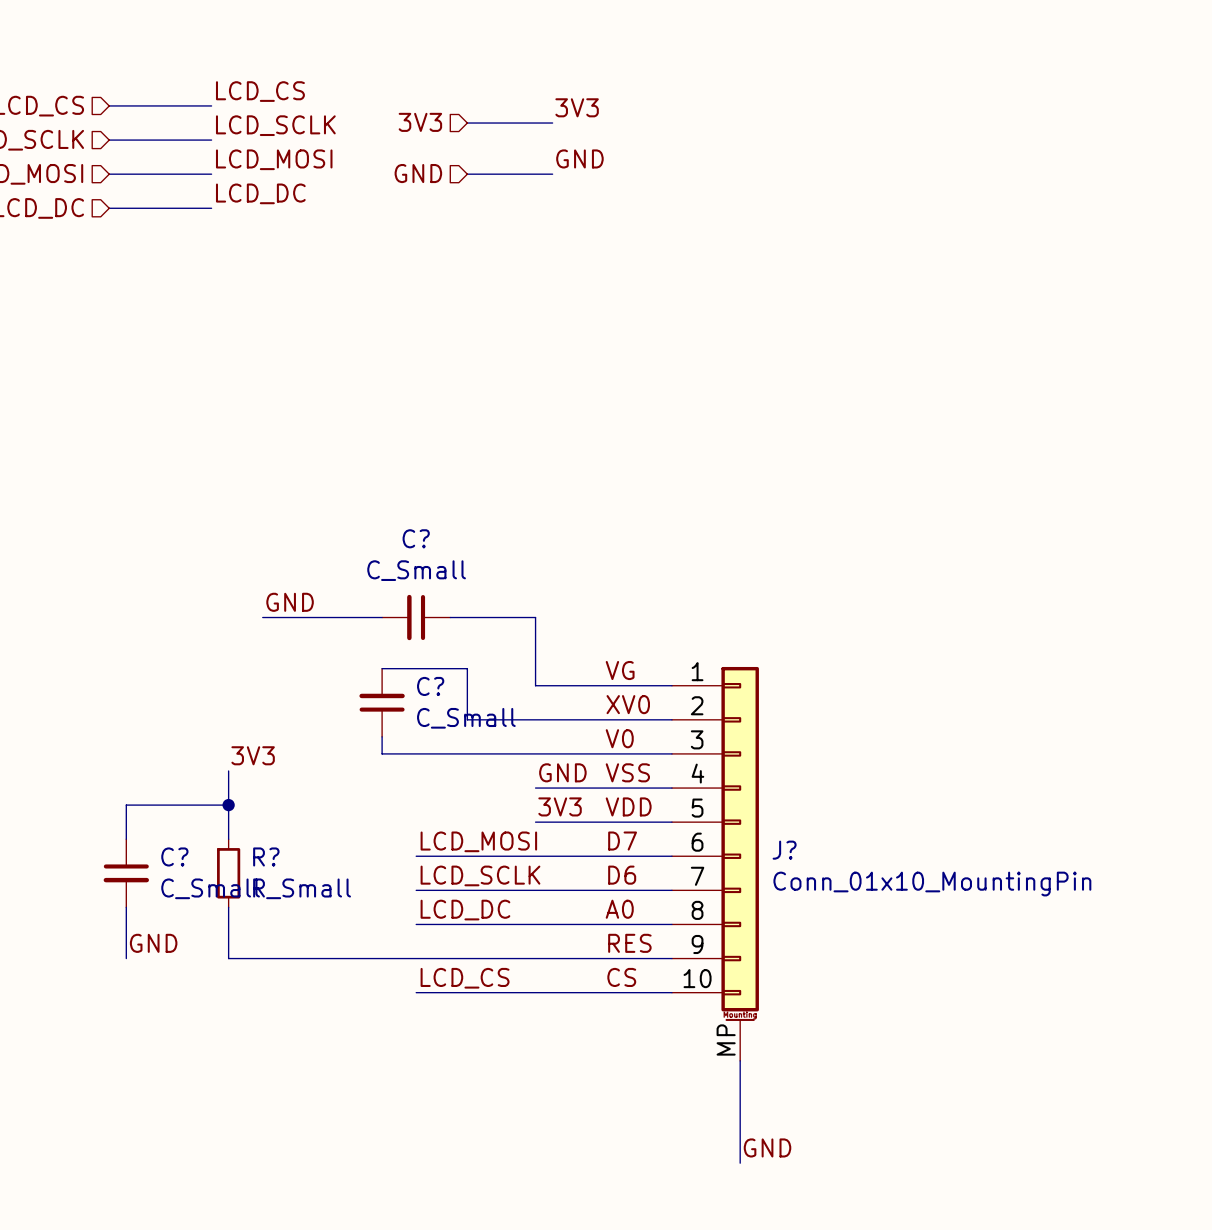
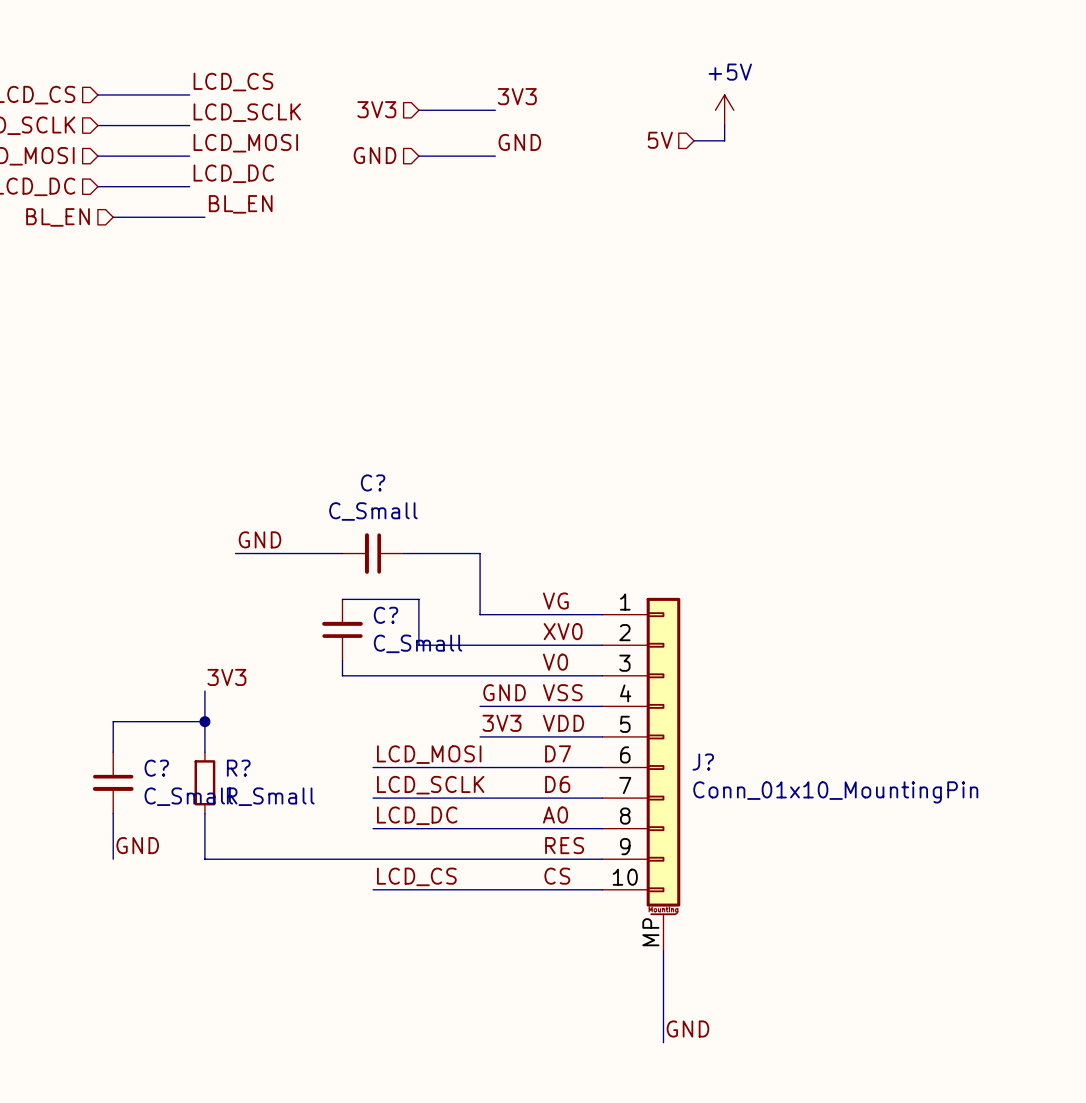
power symbol: none -> +5V (724, 110)
wire: none -> (724, 125) (724, 140) (694, 140)
hierarchical label: none -> 5V (660, 140)
label: none -> BL_EN (240, 204)
hierarchical label: none -> BL_EN (58, 217)
wire: none -> (113, 217) (204, 217)

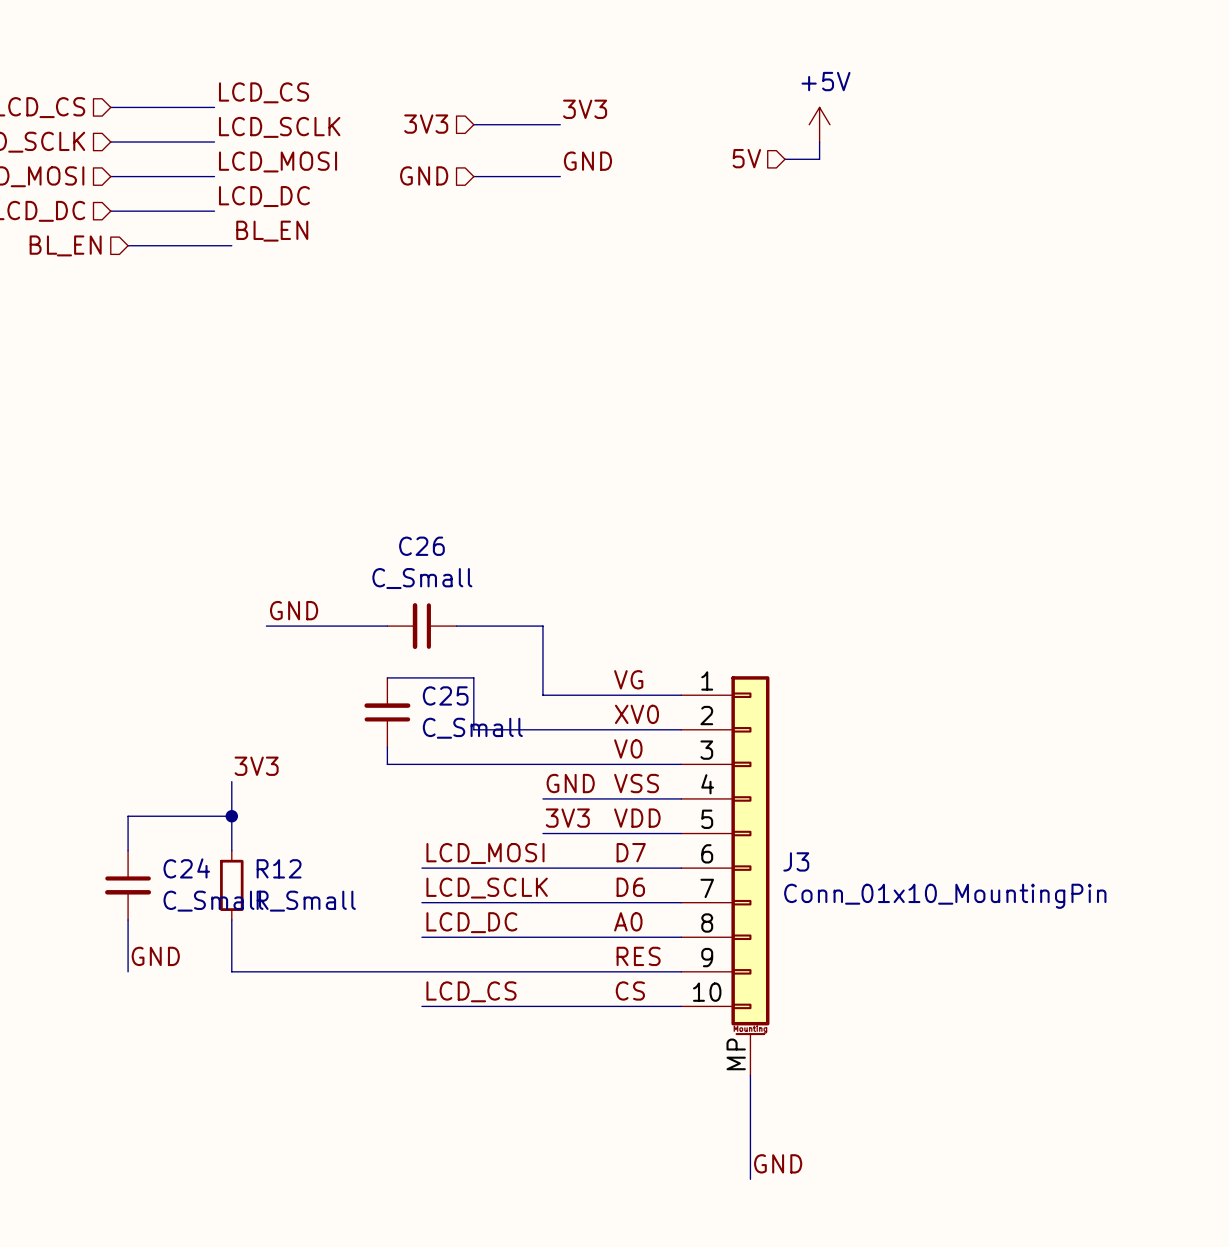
C? name: C? (373, 482) -> C26 (421, 546)
C? name: C? (386, 615) -> C25 (445, 695)
J? name: J? (703, 762) -> J3 (796, 861)
C? name: C? (156, 768) -> C24 (186, 868)
R? name: R? (238, 768) -> R12 (279, 868)

